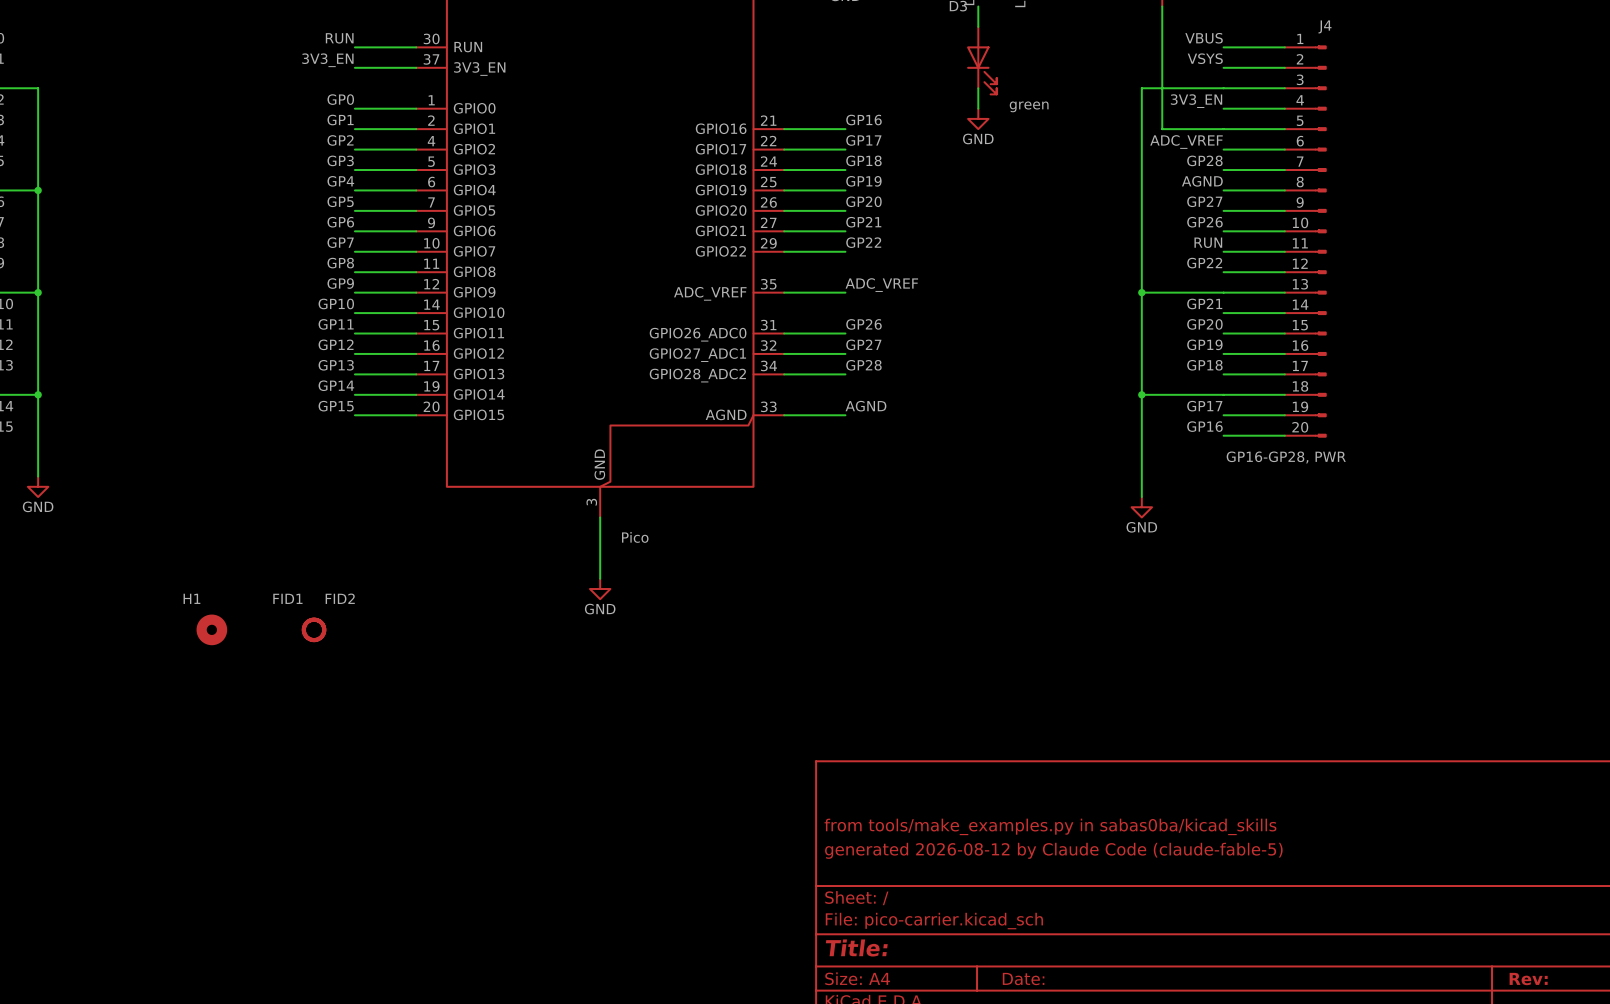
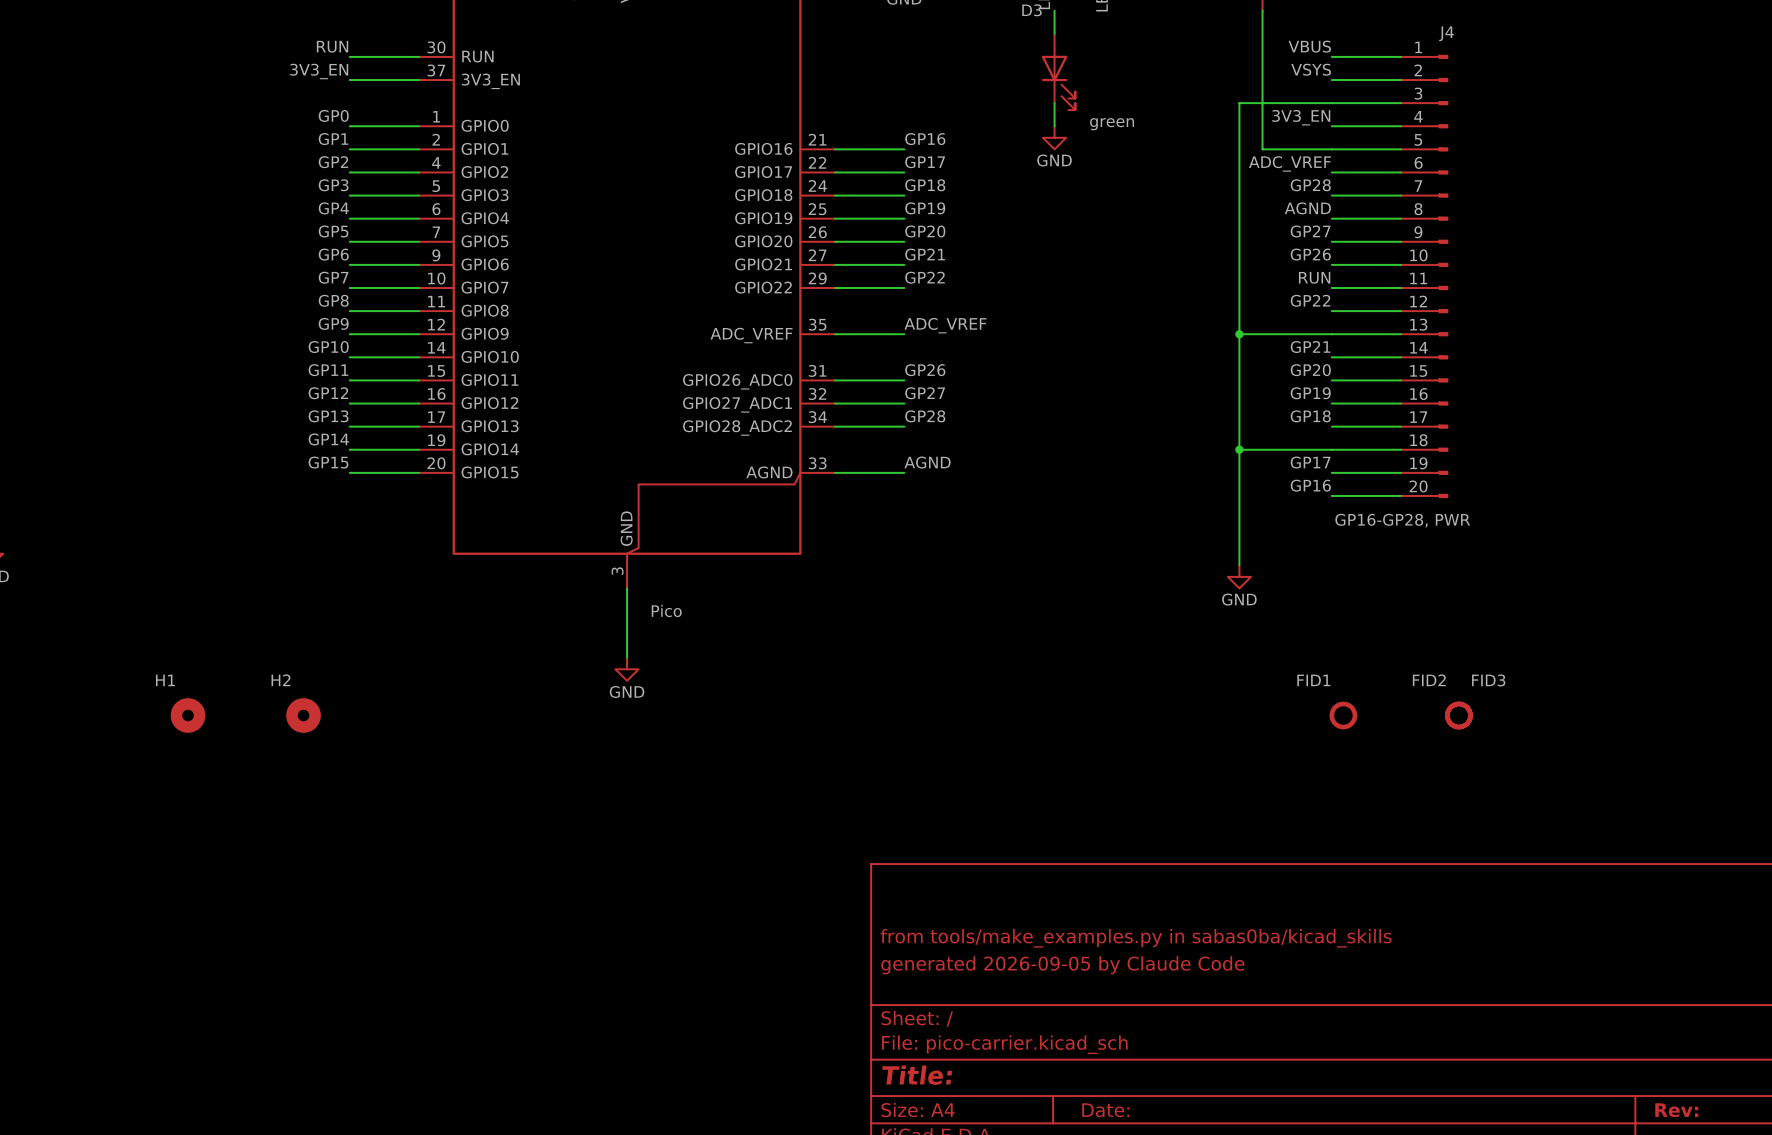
FID2 name position: FID2 (340, 598) -> FID2 (1429, 680)
FID1 position: (314, 629) -> (1343, 715)
FID2 position: (314, 629) -> (1458, 715)
H2: none -> (303, 715)
FID3: none -> (1458, 715)
title block: generated 2026-08-12 by Claude Code (claude-fable-5) (1053, 850) -> generated 2026-09-05 by Claude Code (1062, 965)

